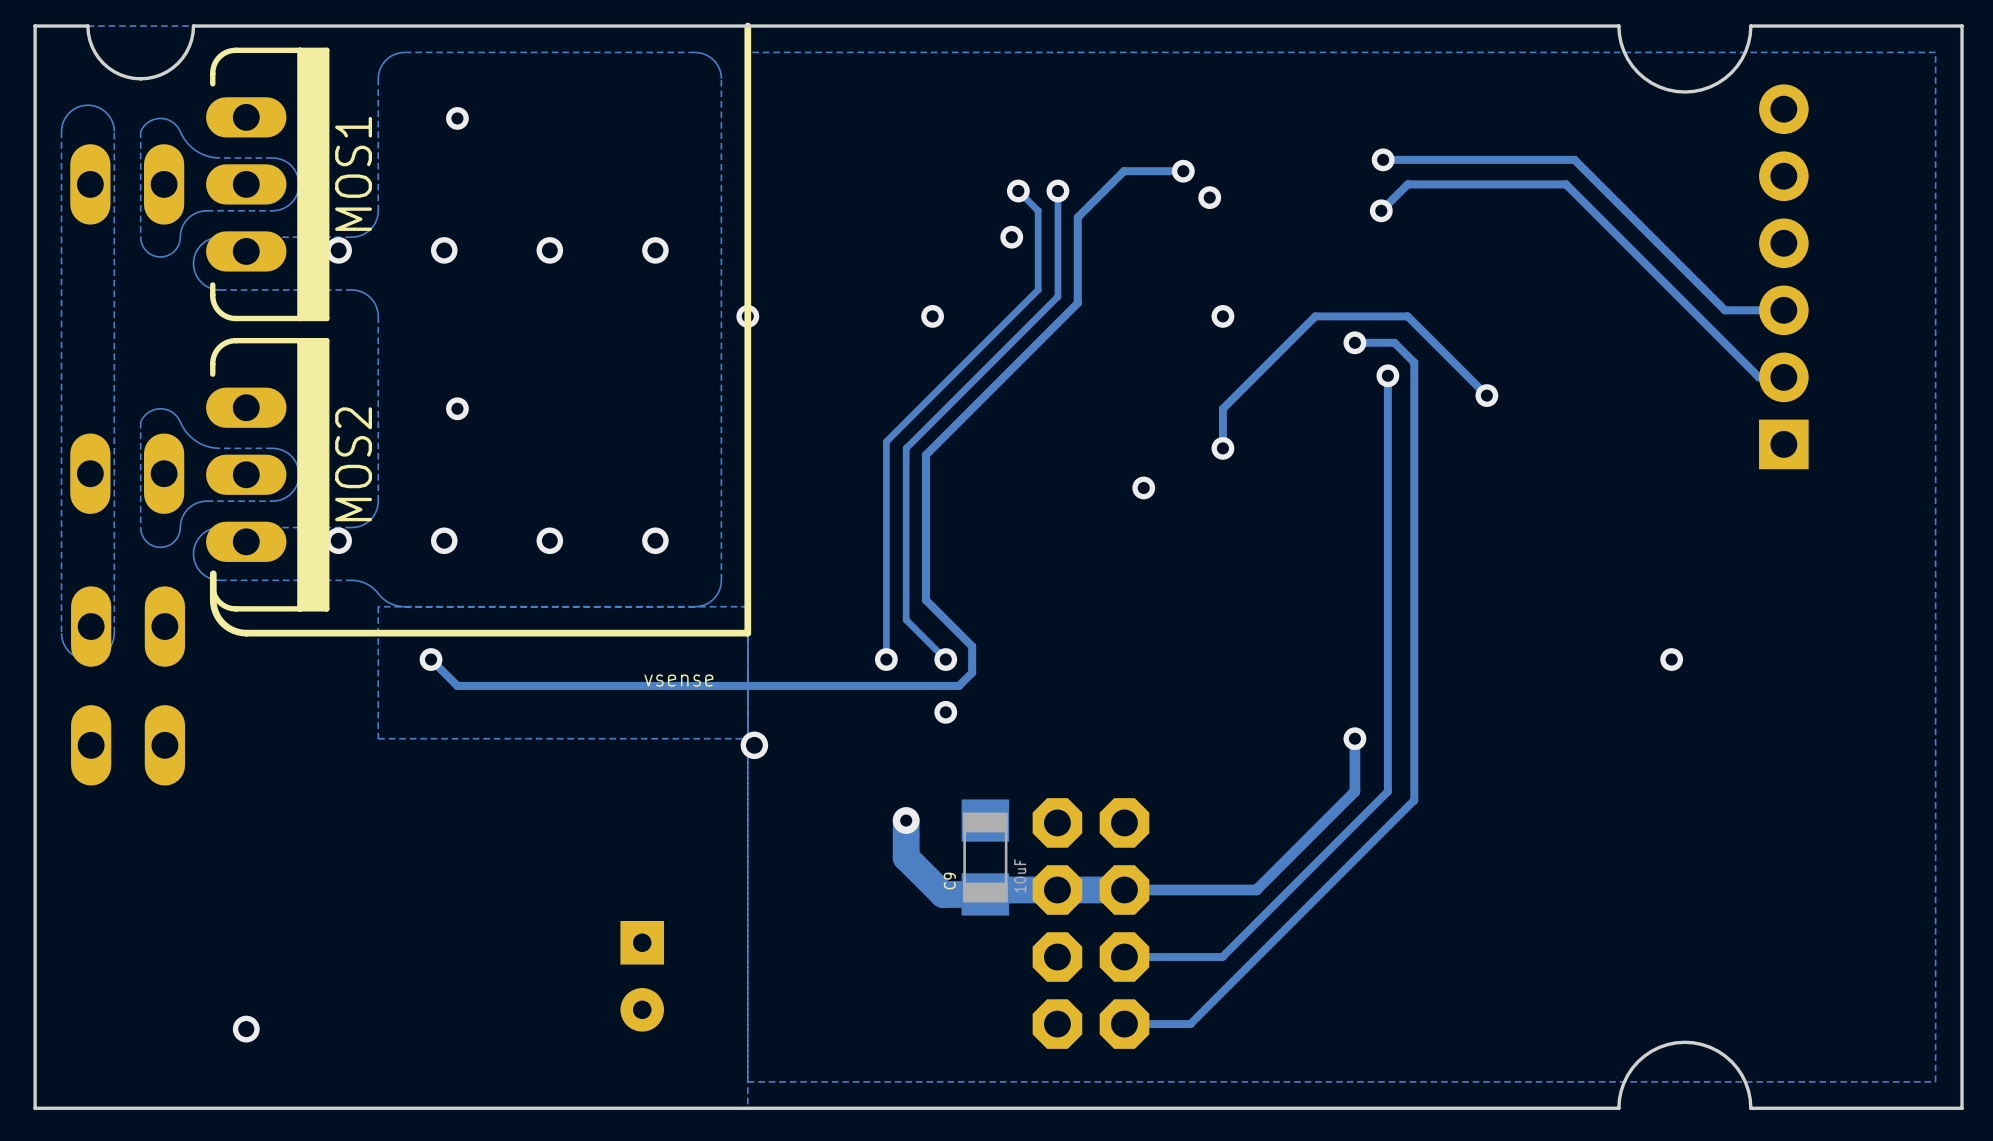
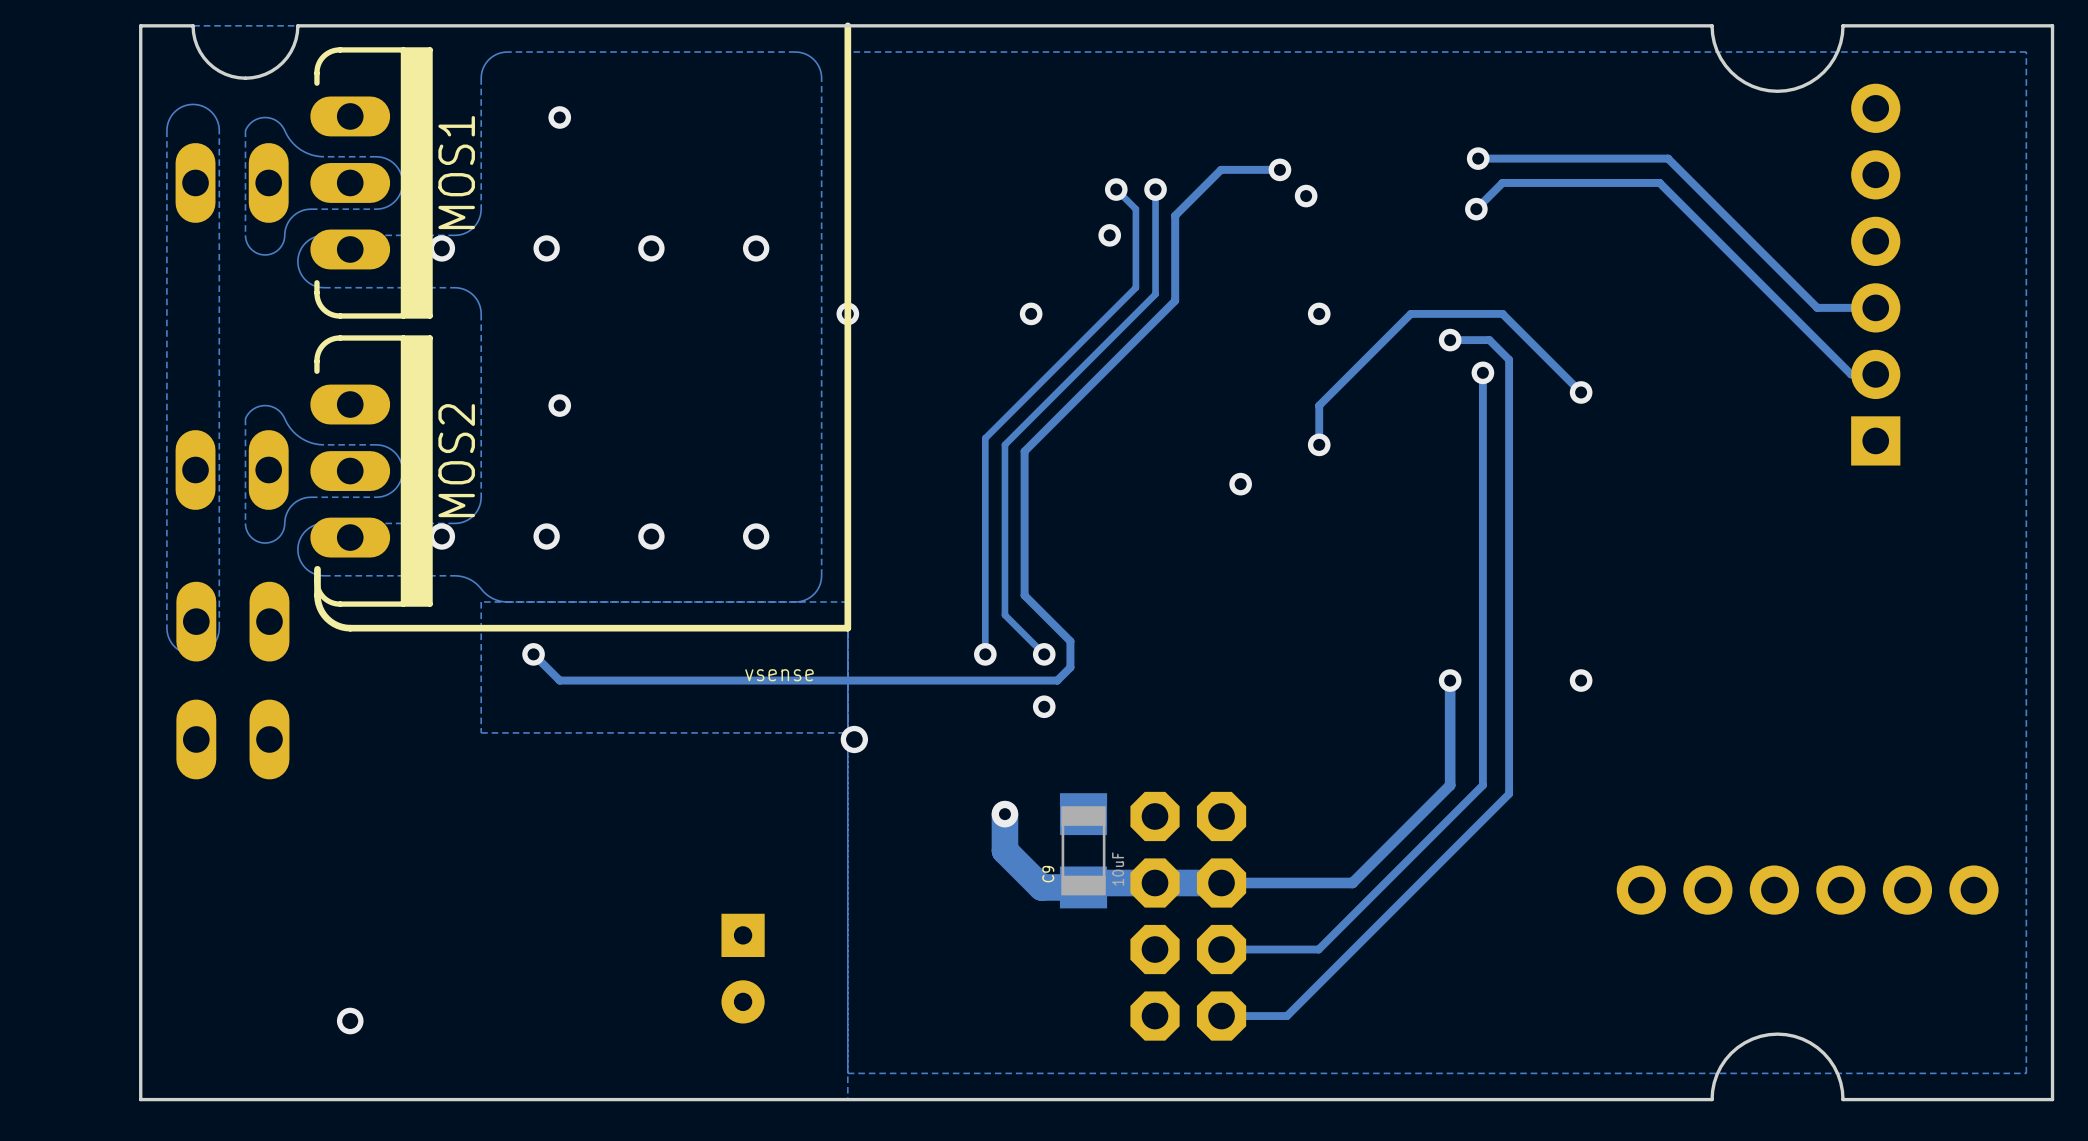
via: (1671, 659) -> none
track: none -> (1450, 680) (1450, 732)
via: none -> (1581, 680)
via position: (1354, 738) -> (1450, 680)
part: none -> (1807, 890)

